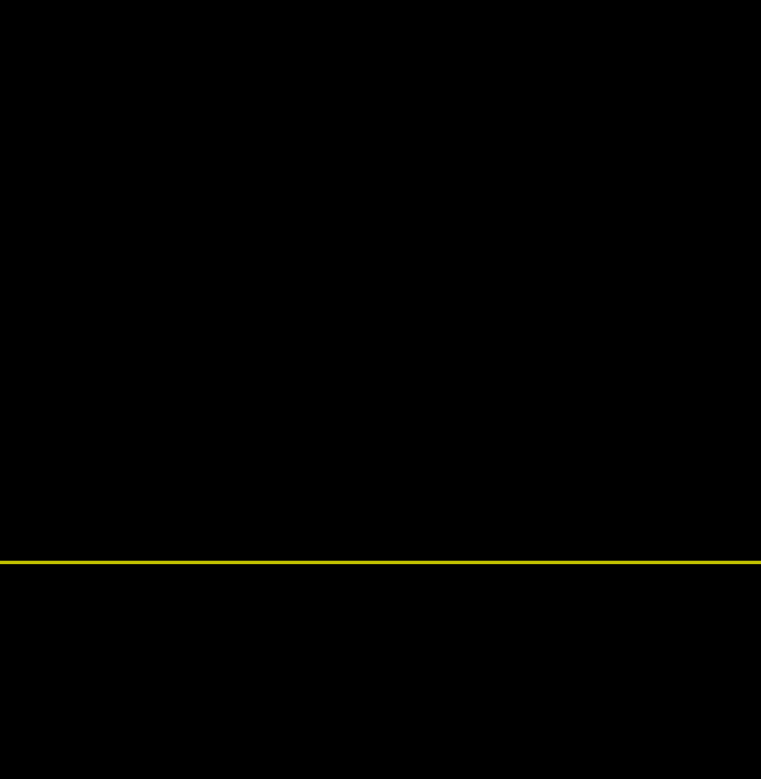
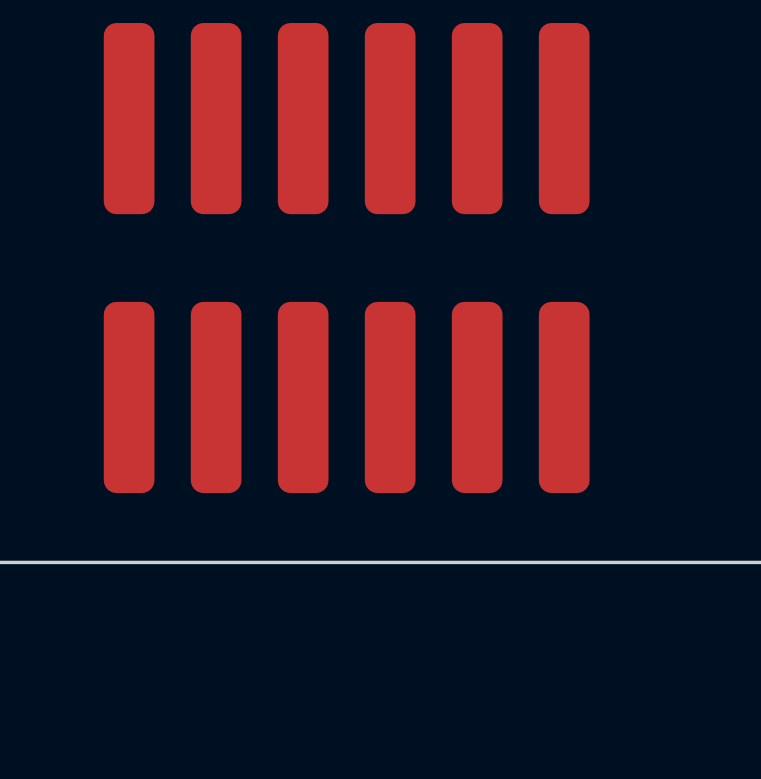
part: none -> (346, 258)

